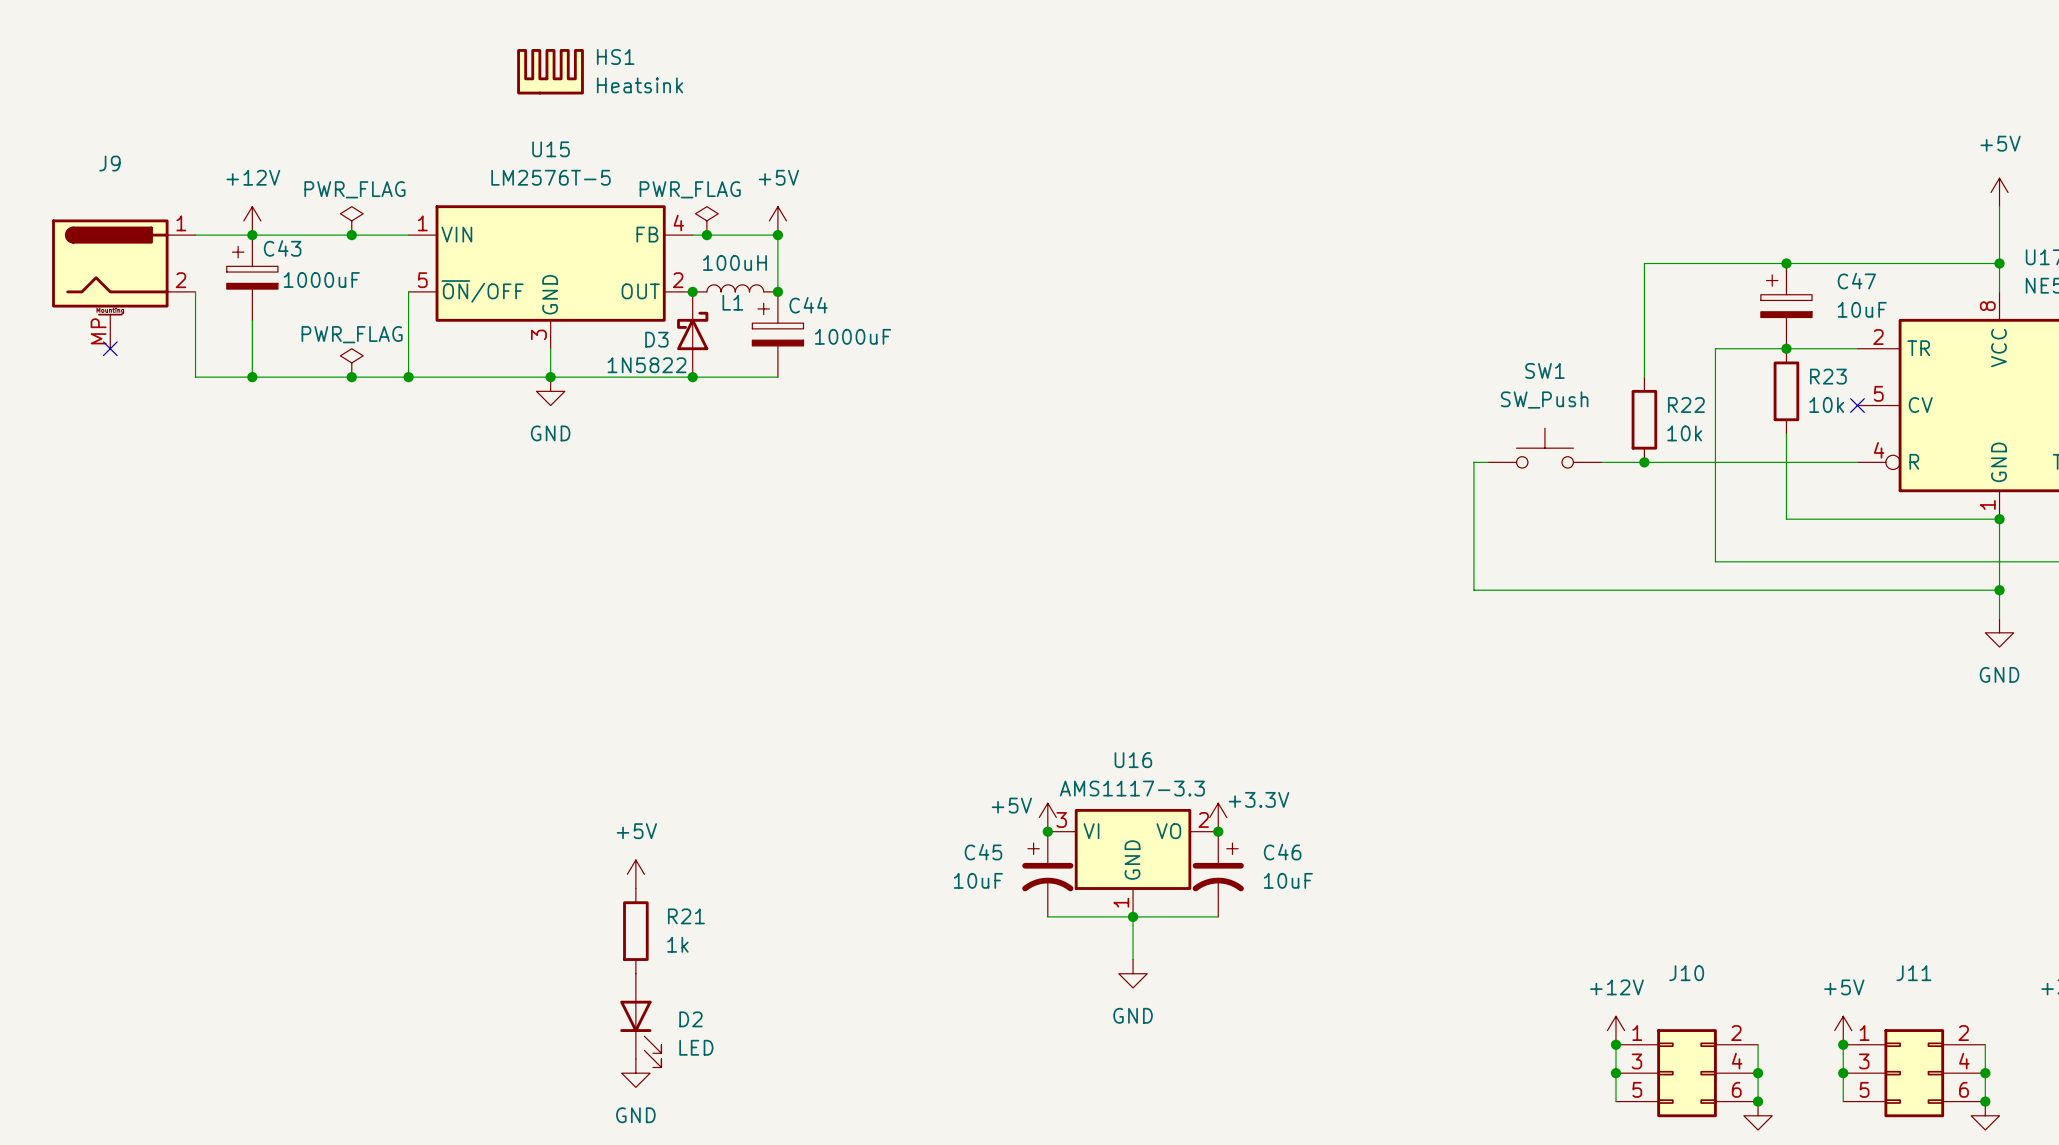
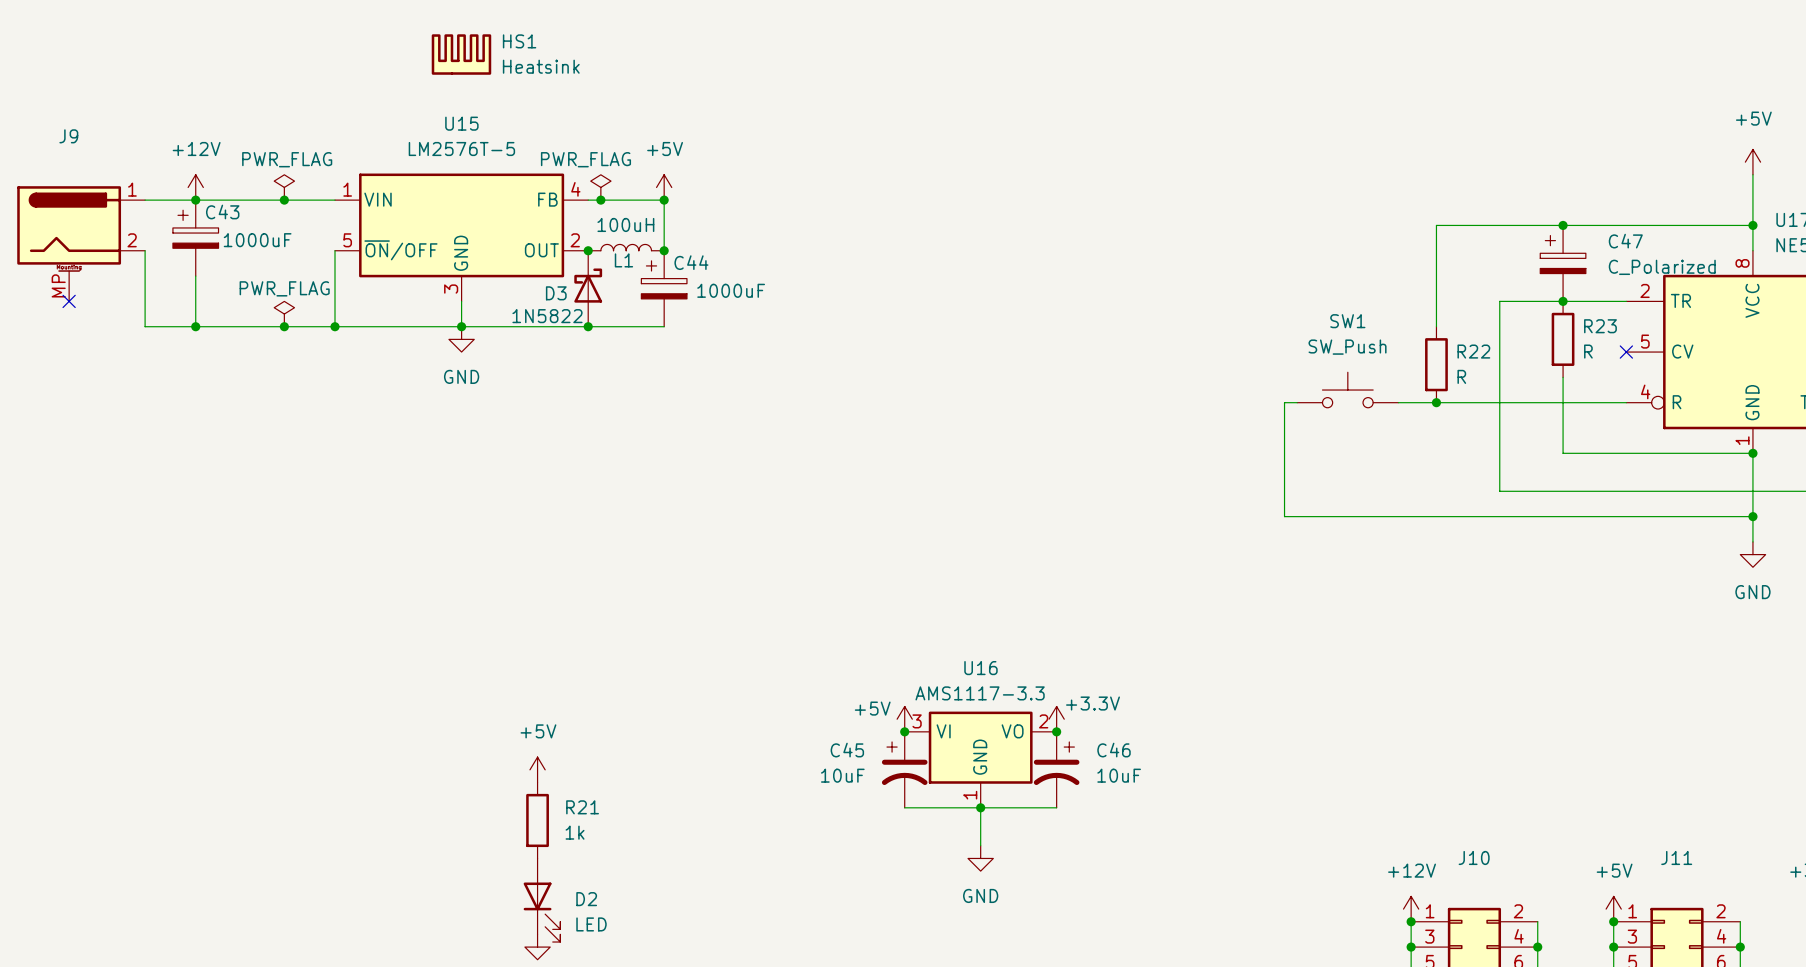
C47 value: 10uF (1862, 309) -> C_Polarized (1662, 267)
R23 value: 10k (1826, 405) -> R (1588, 351)
R22 value: 10k (1684, 433) -> R (1461, 376)

